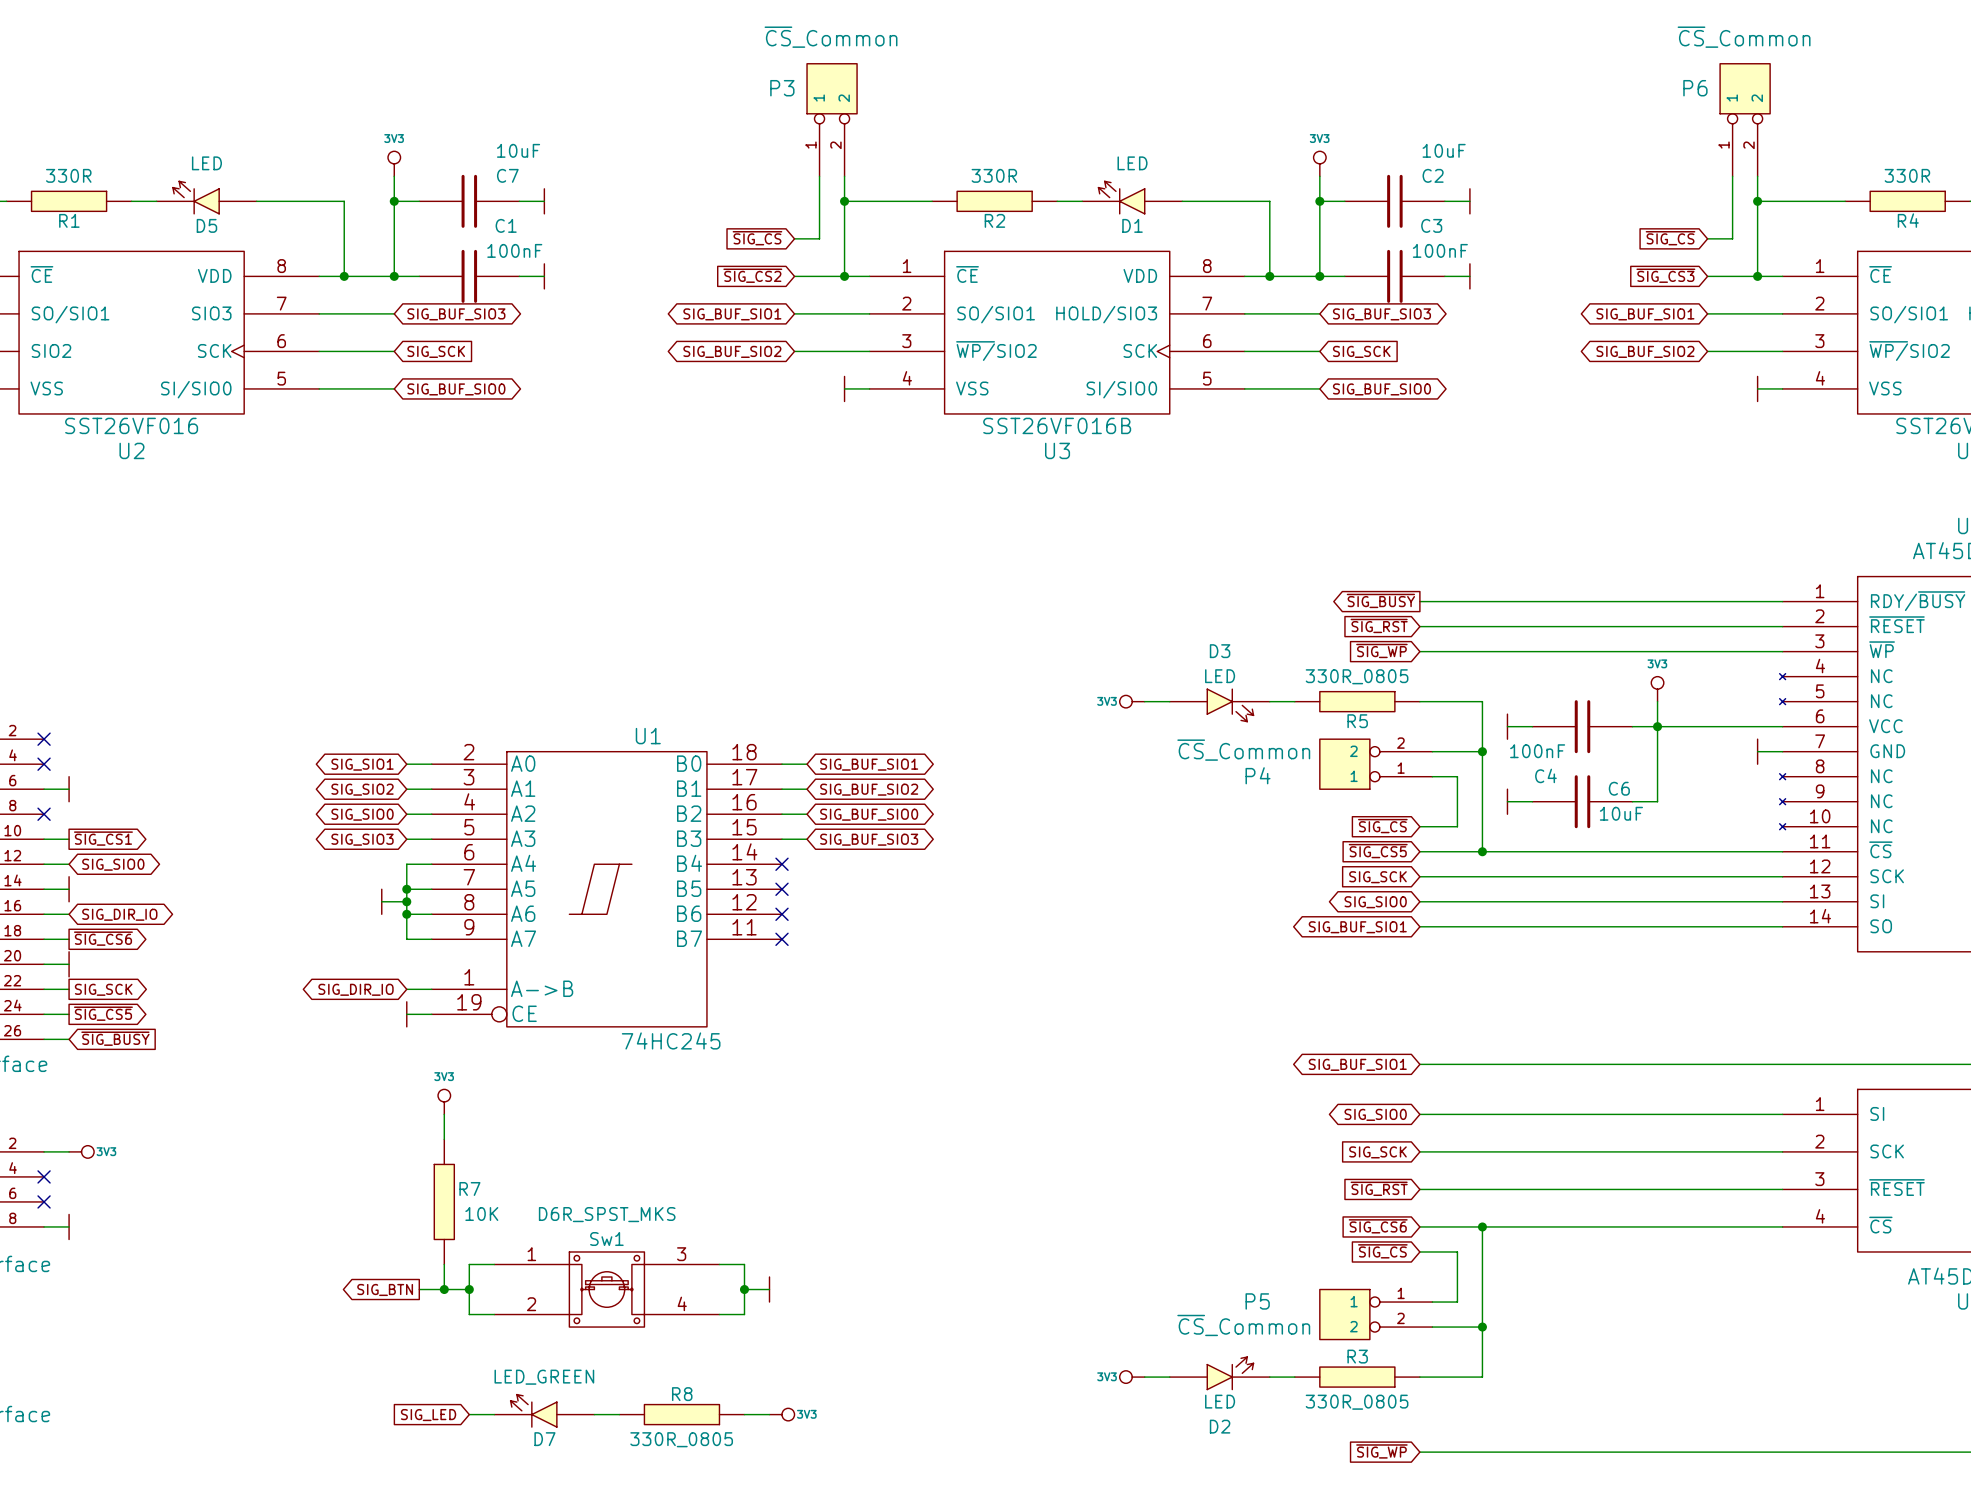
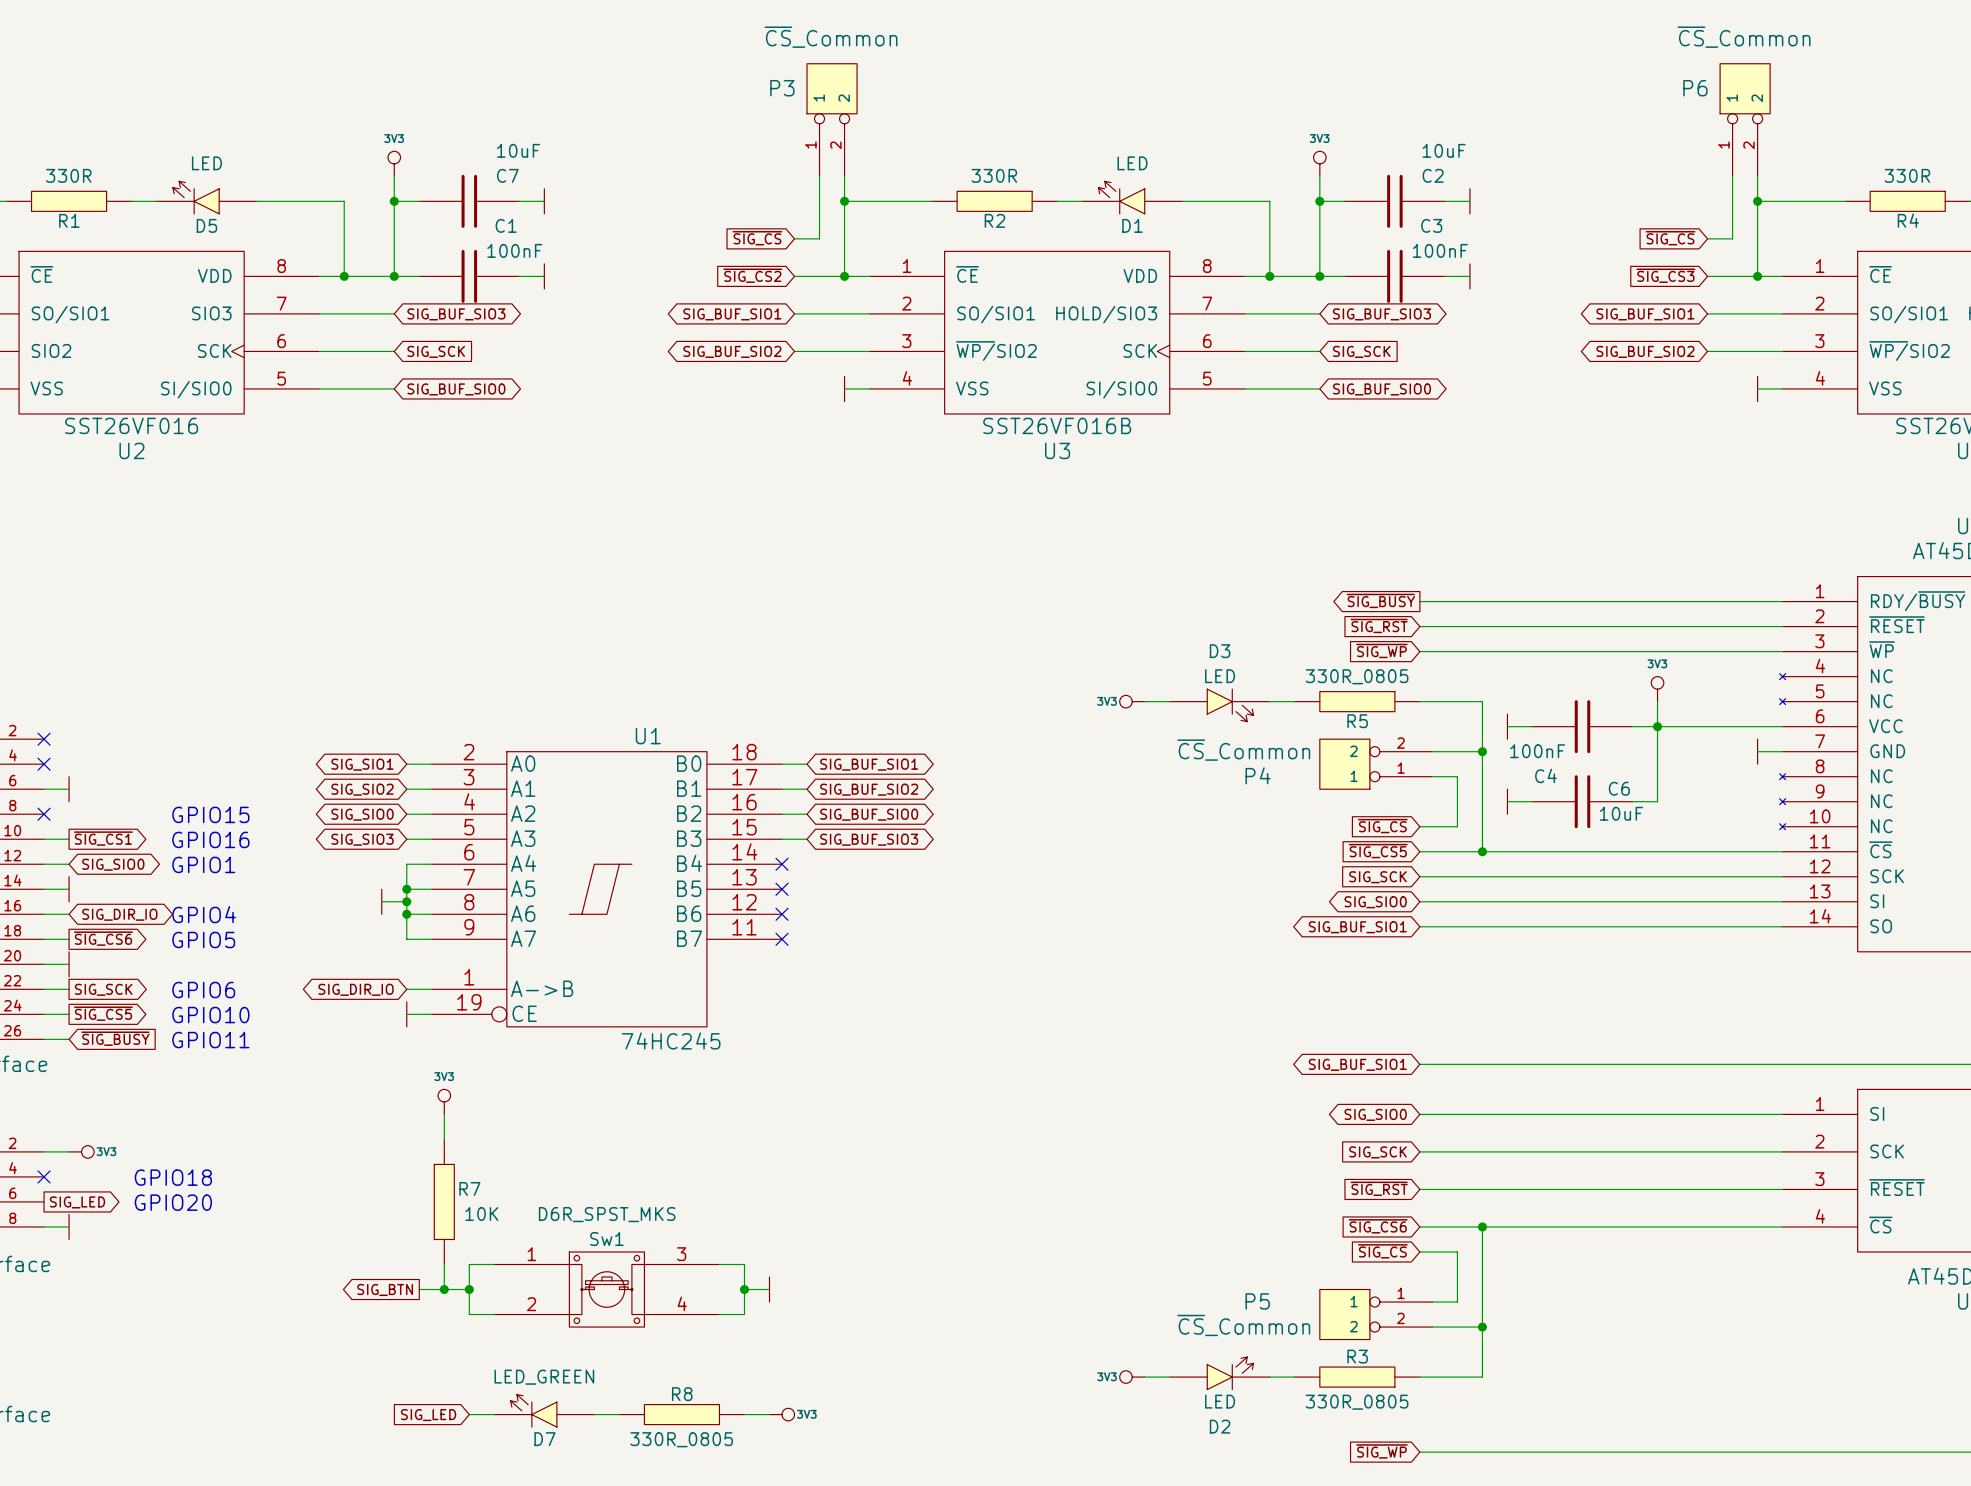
text: none -> GPIO15 (210, 814)
text: none -> GPIO16 (210, 839)
text: none -> GPIO1 (203, 864)
text: none -> GPIO4 (204, 914)
text: none -> GPIO5 (203, 940)
text: none -> GPIO6 (203, 990)
text: none -> GPIO10 (210, 1015)
text: none -> GPIO11 (210, 1040)
text: none -> GPIO18 (173, 1177)
no-connect mark: (44, 1201) -> none
global label: none -> SIG_LED (77, 1202)
text: none -> GPIO20 (173, 1202)

